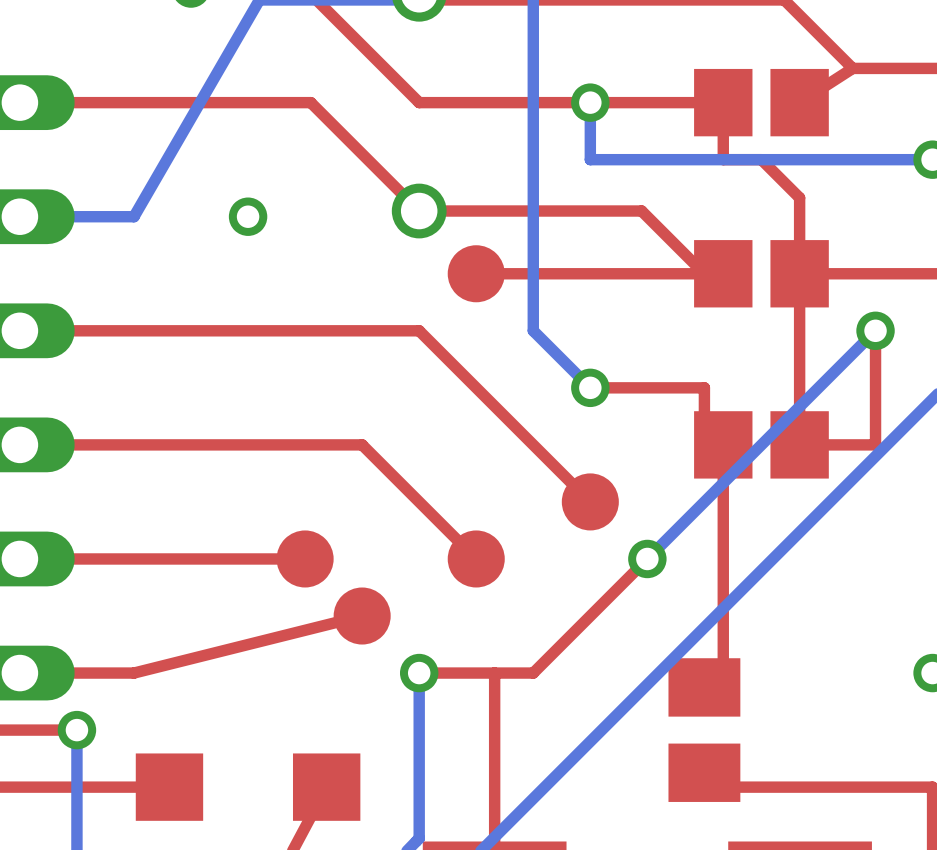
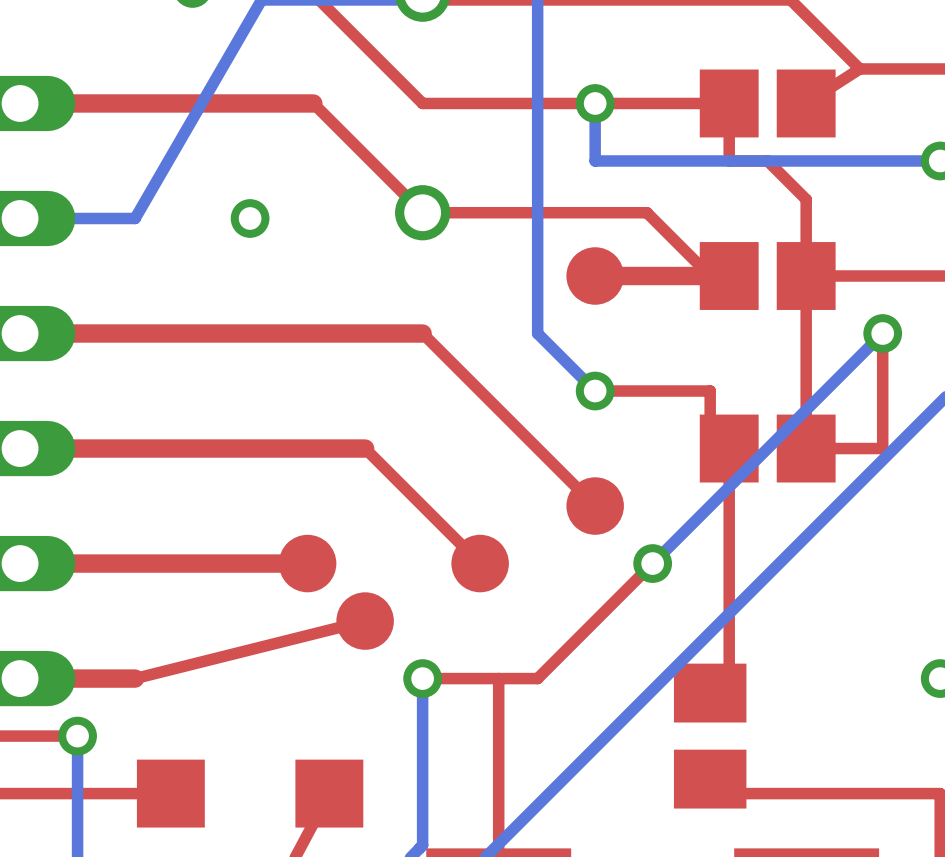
top track width: thin (310, 102) (19, 102) -> thick (313, 103) (20, 103)
part position: (476, 273) -> (595, 276)
top track: (590, 273) (476, 273) -> none
top track width: thin (723, 273) (590, 273) -> thick (729, 276) (595, 276)
top track width: thin (419, 330) (19, 330) -> thick (422, 333) (20, 333)
top track width: thin (362, 444) (19, 444) -> thick (365, 448) (20, 448)
top track width: thin (305, 558) (19, 558) -> thick (307, 563) (20, 563)
top track width: thin (133, 673) (19, 673) -> thick (135, 678) (20, 678)

